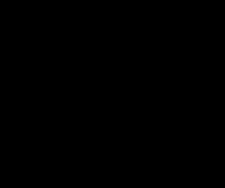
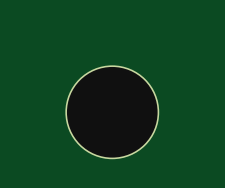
hole: none -> (112, 112)

